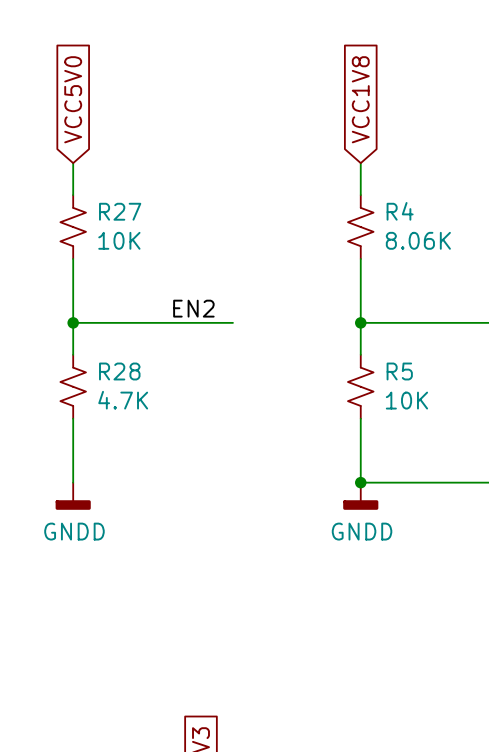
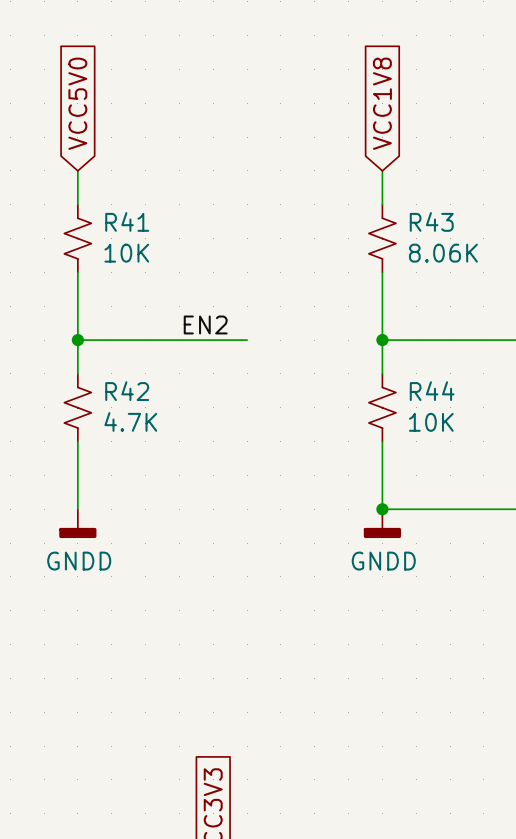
R27 name: R27 (120, 211) -> R41 (127, 221)
R4 name: R4 (400, 211) -> R43 (431, 221)
R28 name: R28 (119, 371) -> R42 (127, 391)
R5 name: R5 (399, 371) -> R44 (432, 391)

